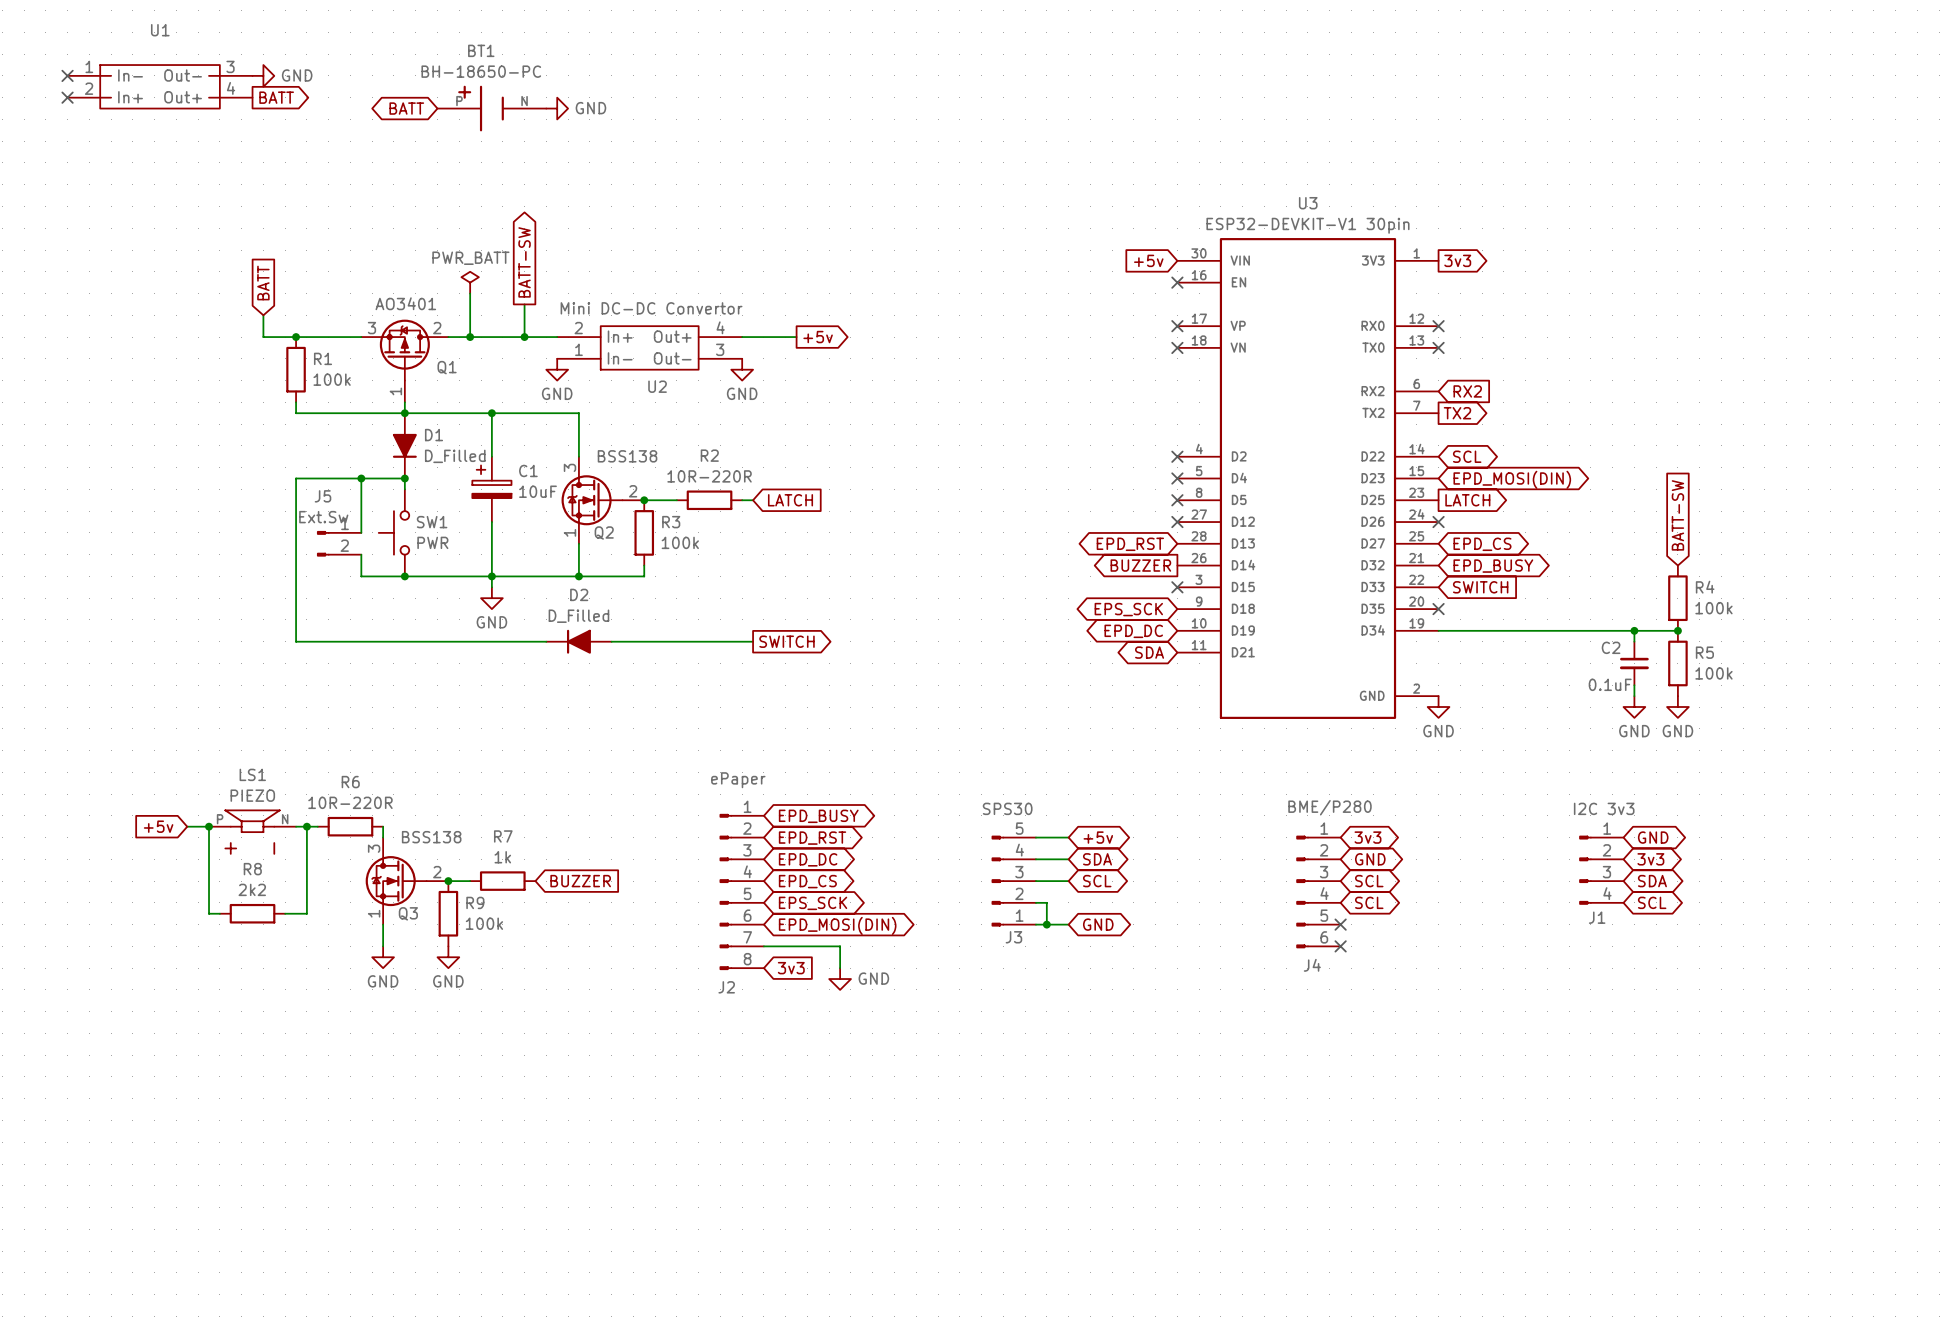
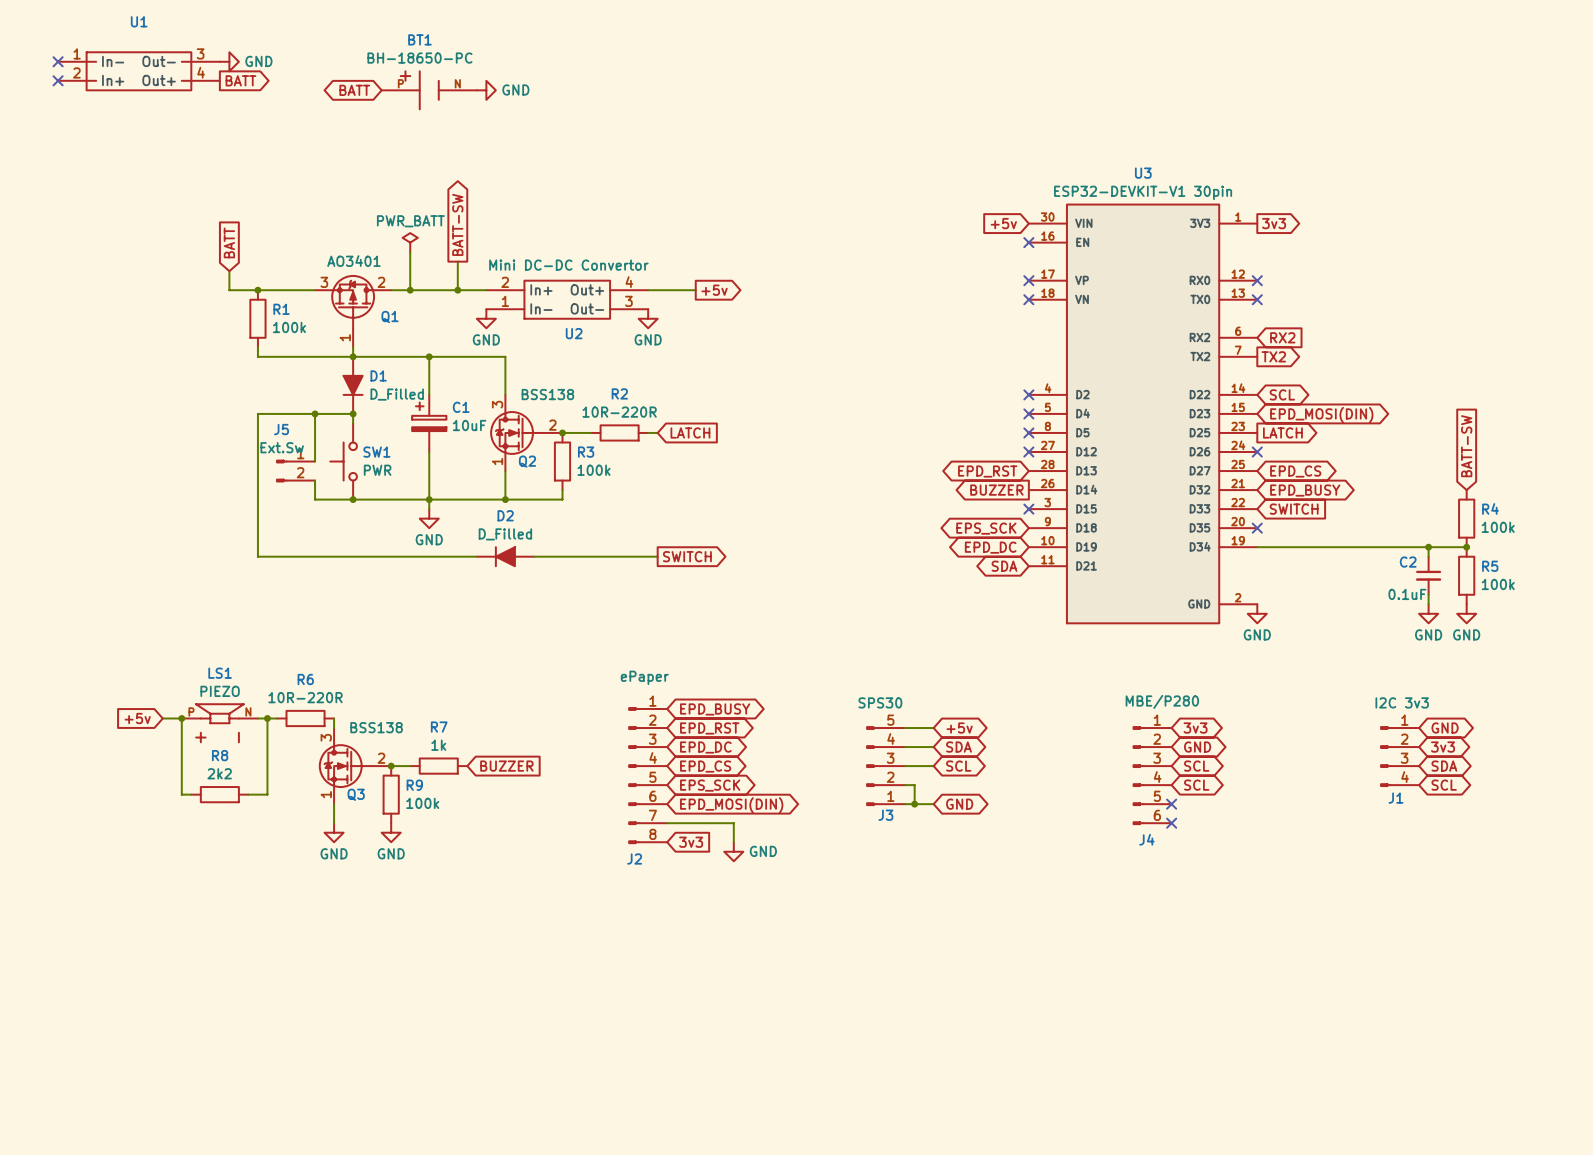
J4 value: BME/P280 (1330, 807) -> MBE/P280 (1162, 701)

